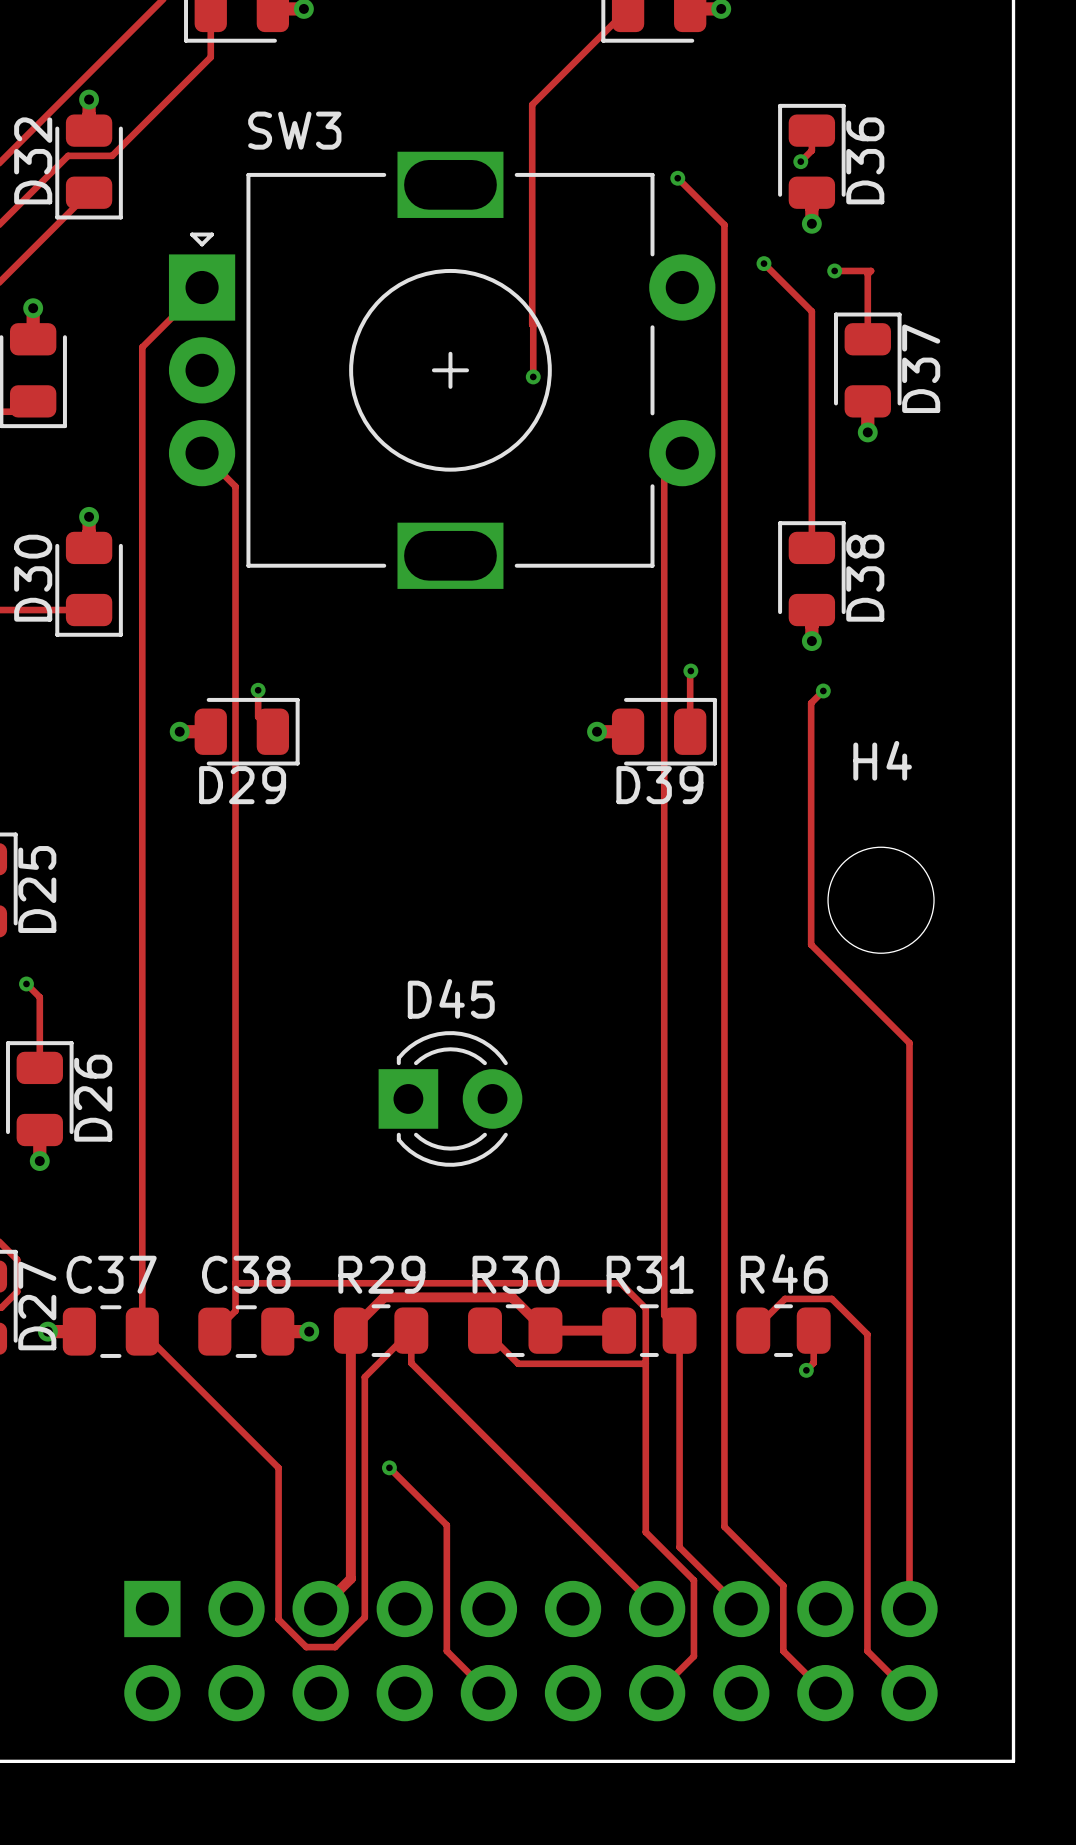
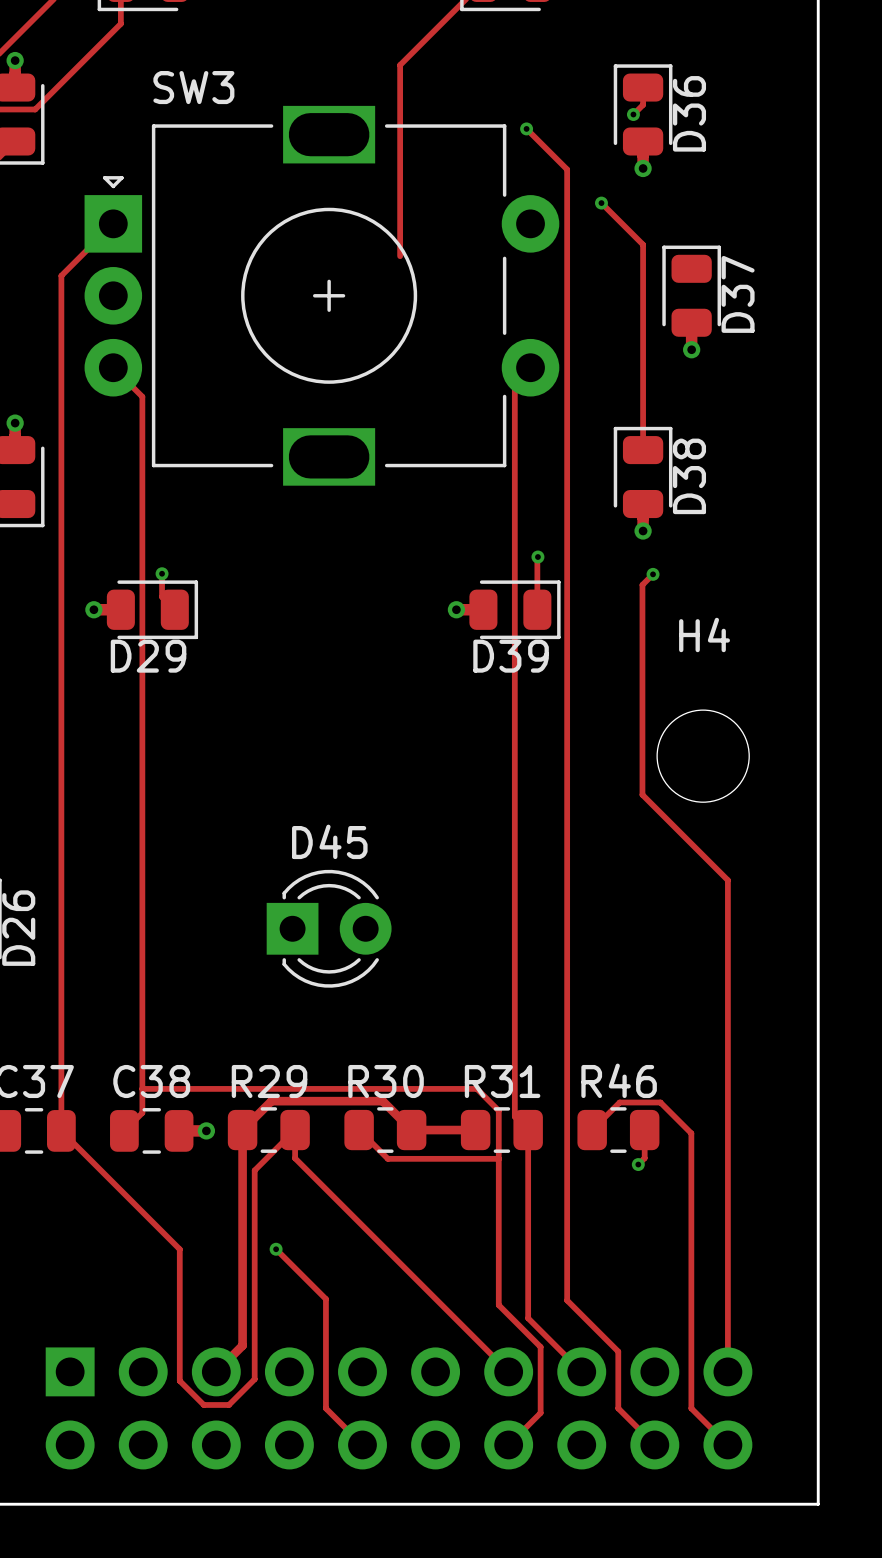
track: (834, 270) (871, 270) (867, 274) (867, 339) -> none
via: (834, 270) -> none
track: (532, 324) (533, 376) -> none
via: (533, 376) -> none

